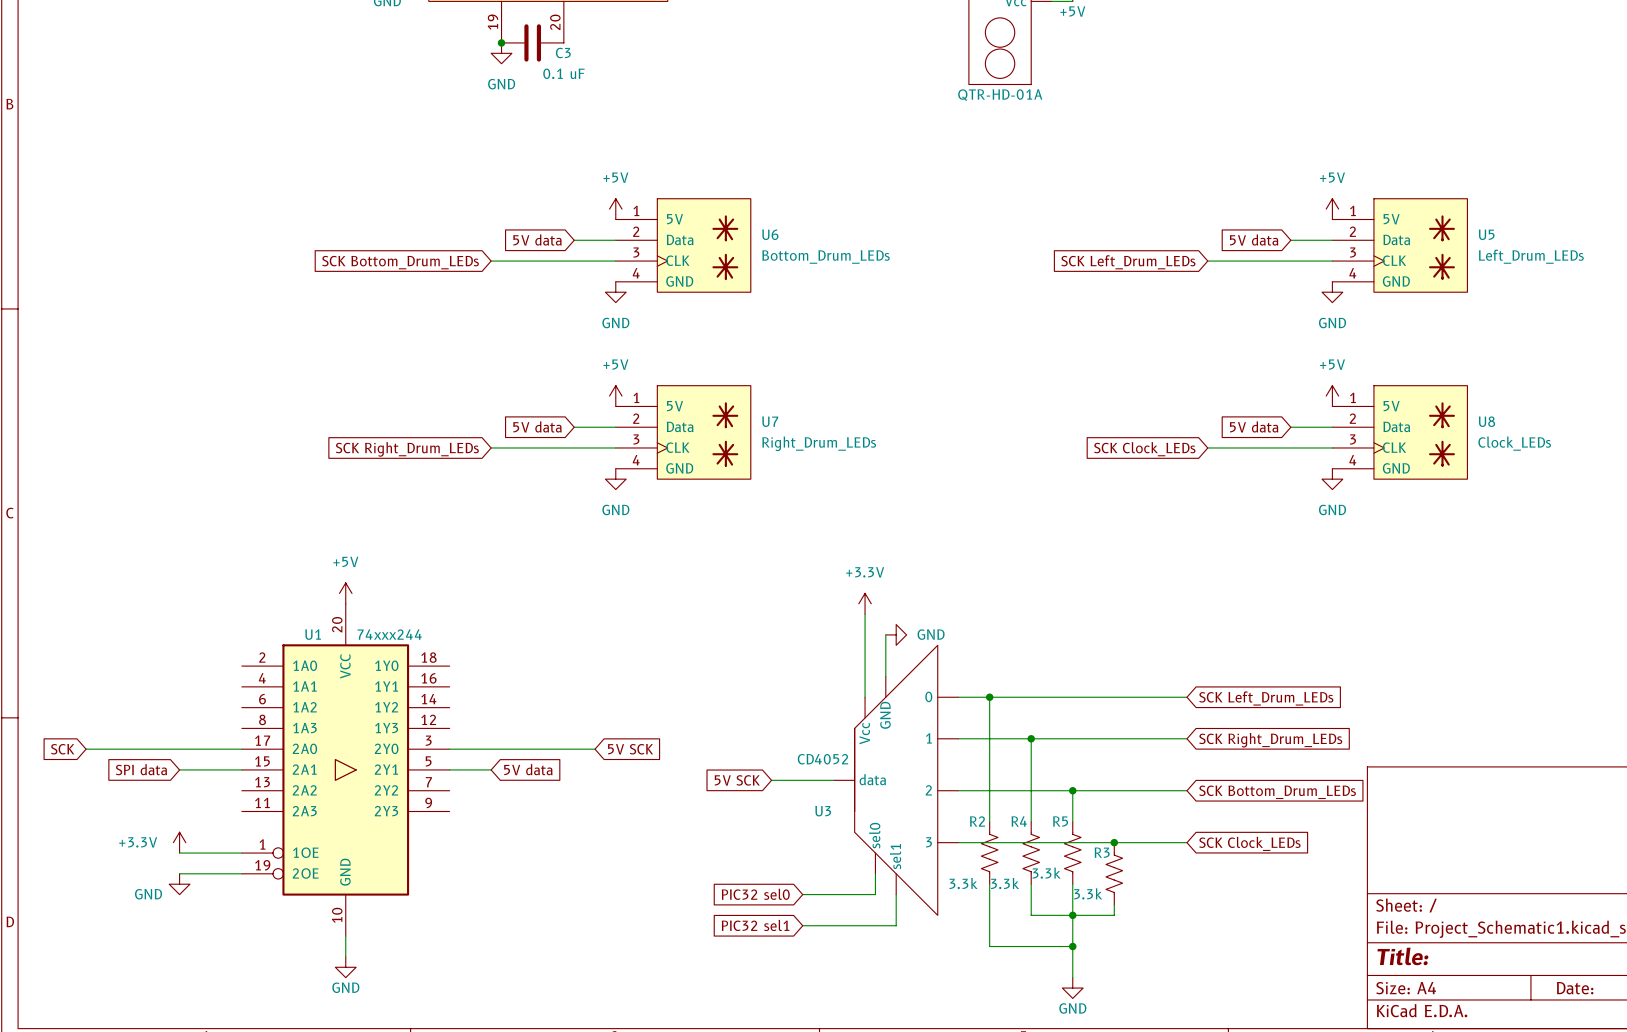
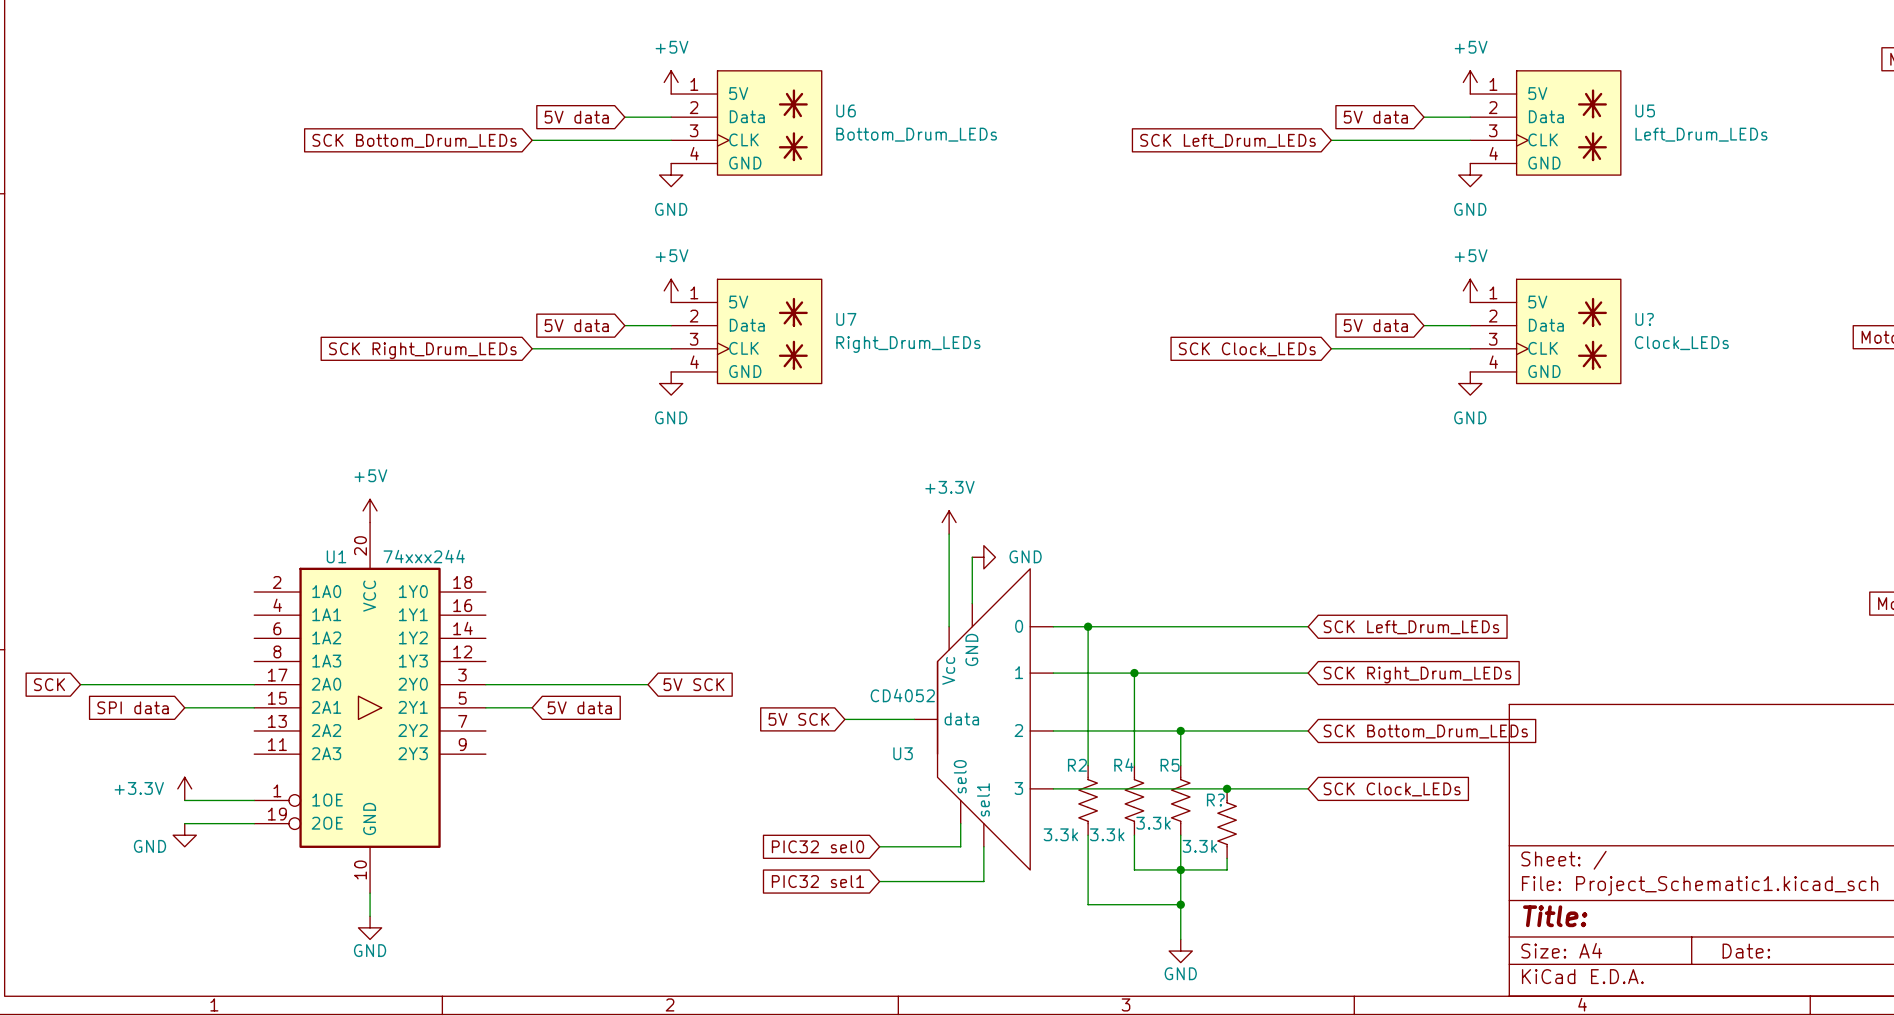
U8 name: U8 (1486, 421) -> U? (1644, 319)
R3 name: R3 (1102, 852) -> R? (1215, 800)

